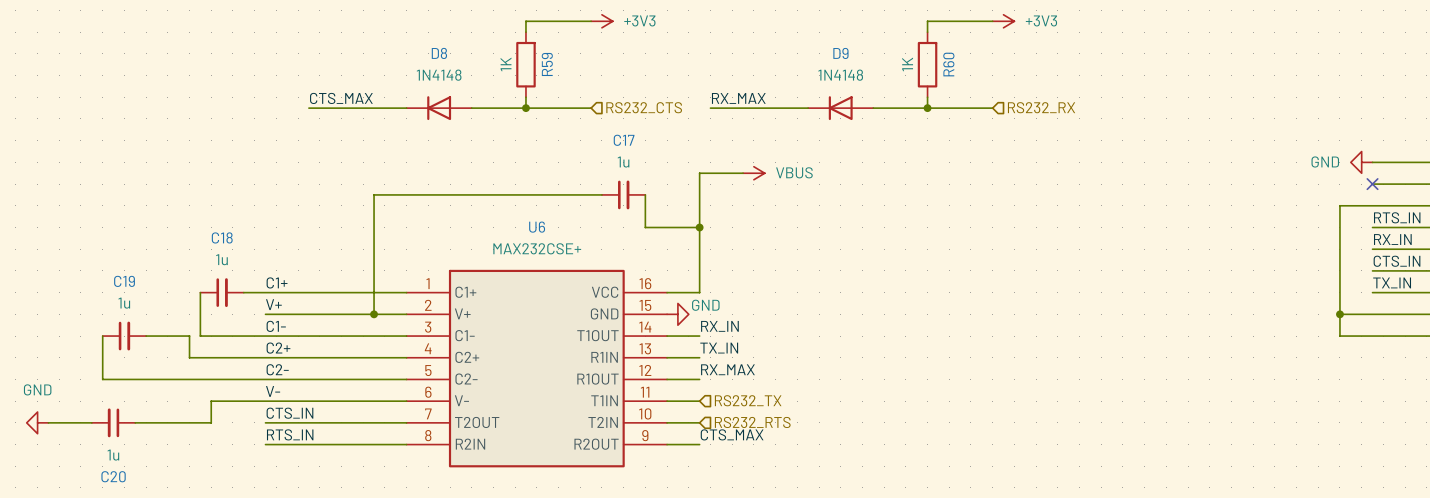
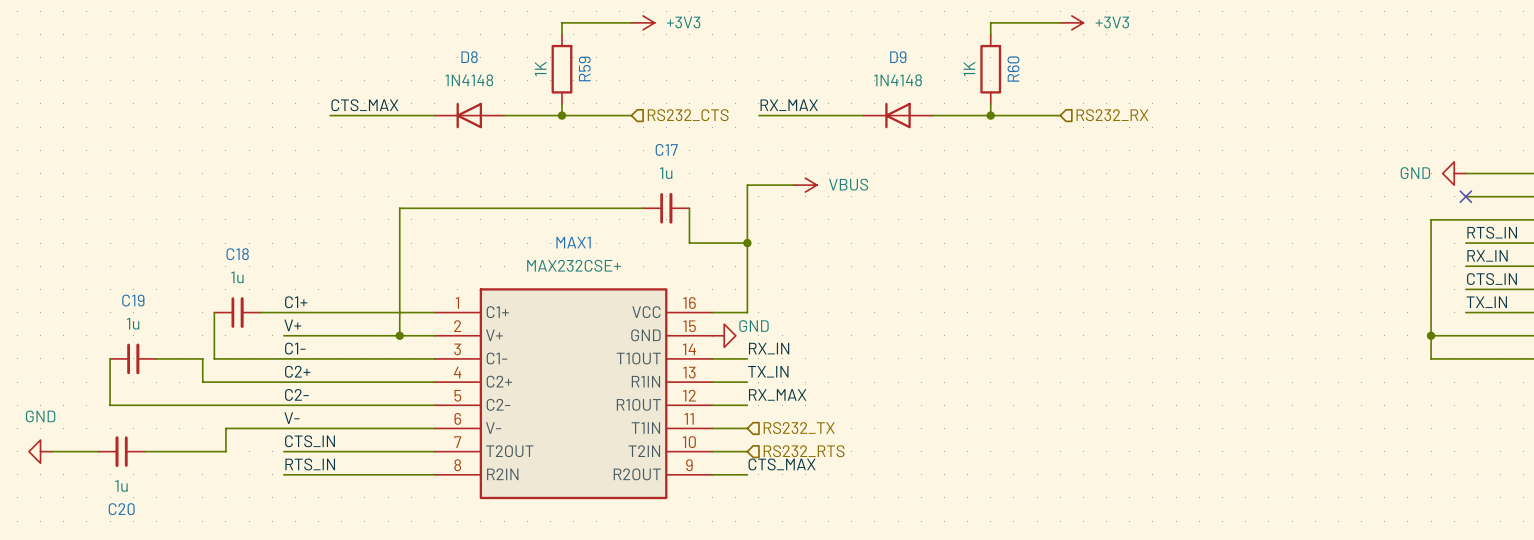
U6 name: U6 (537, 227) -> MAX1 (573, 242)

